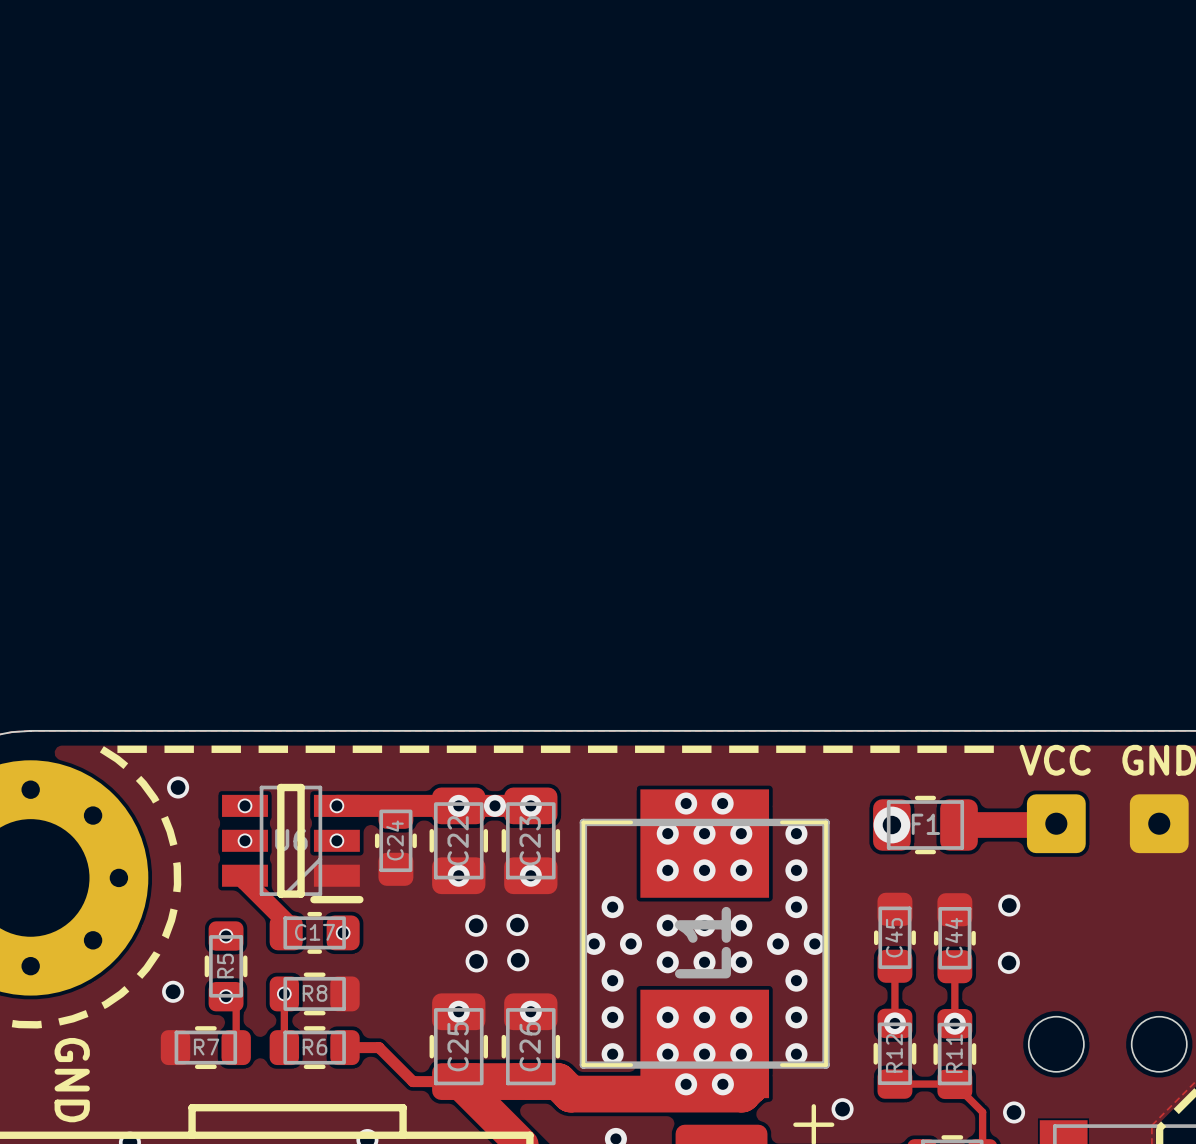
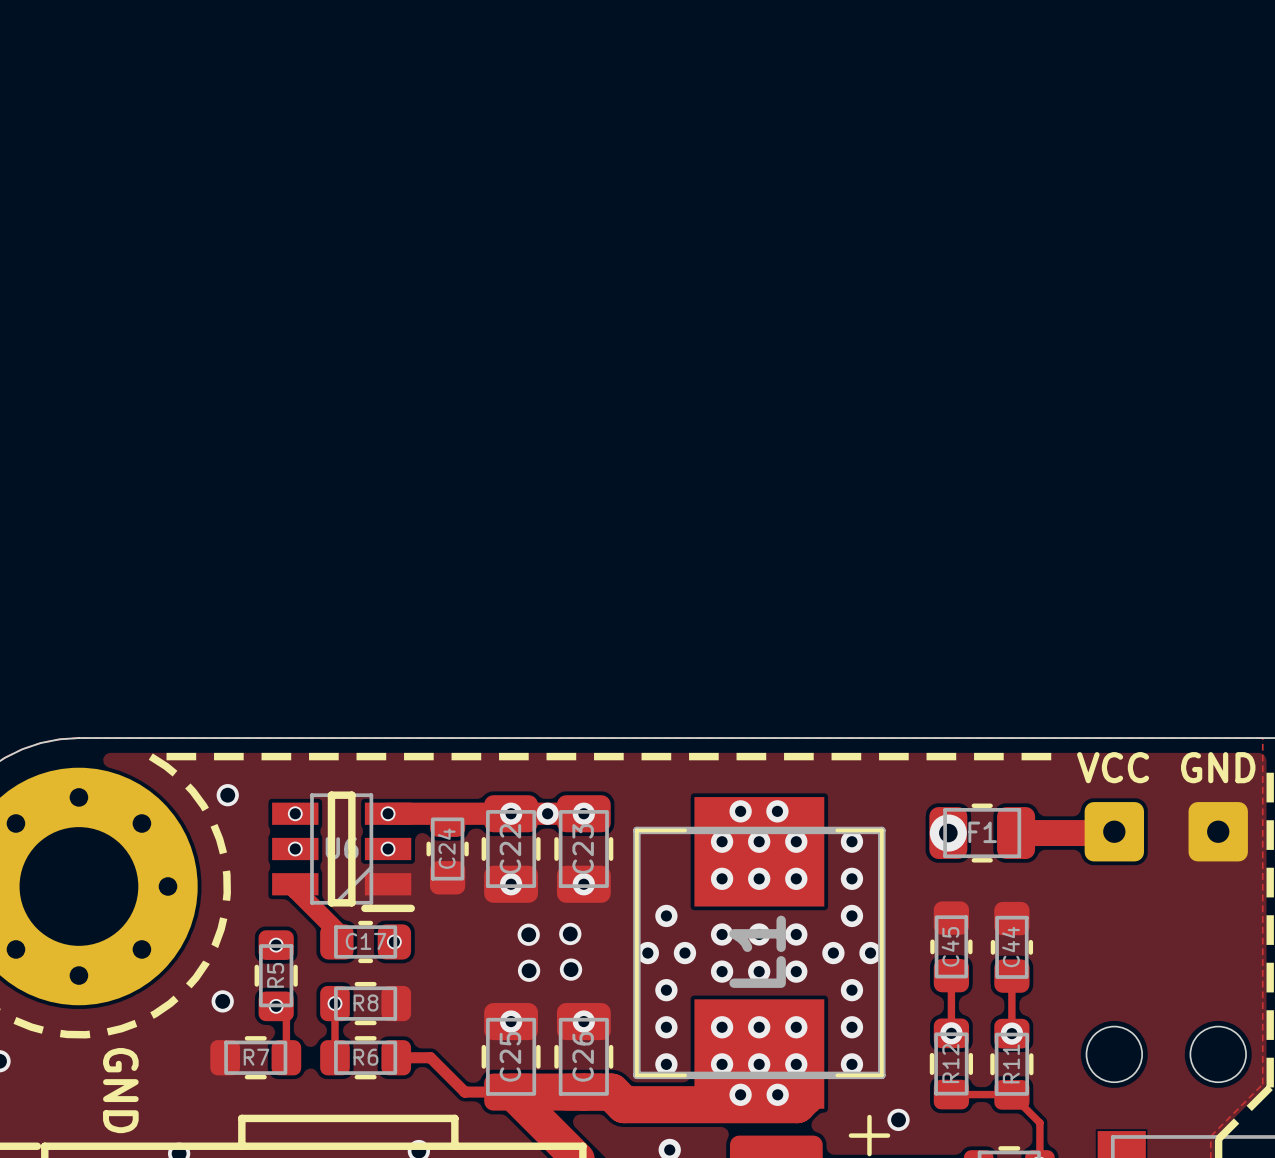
via: (1009, 905) -> none
via: (1008, 962) -> none
via: (1014, 1112) -> none

